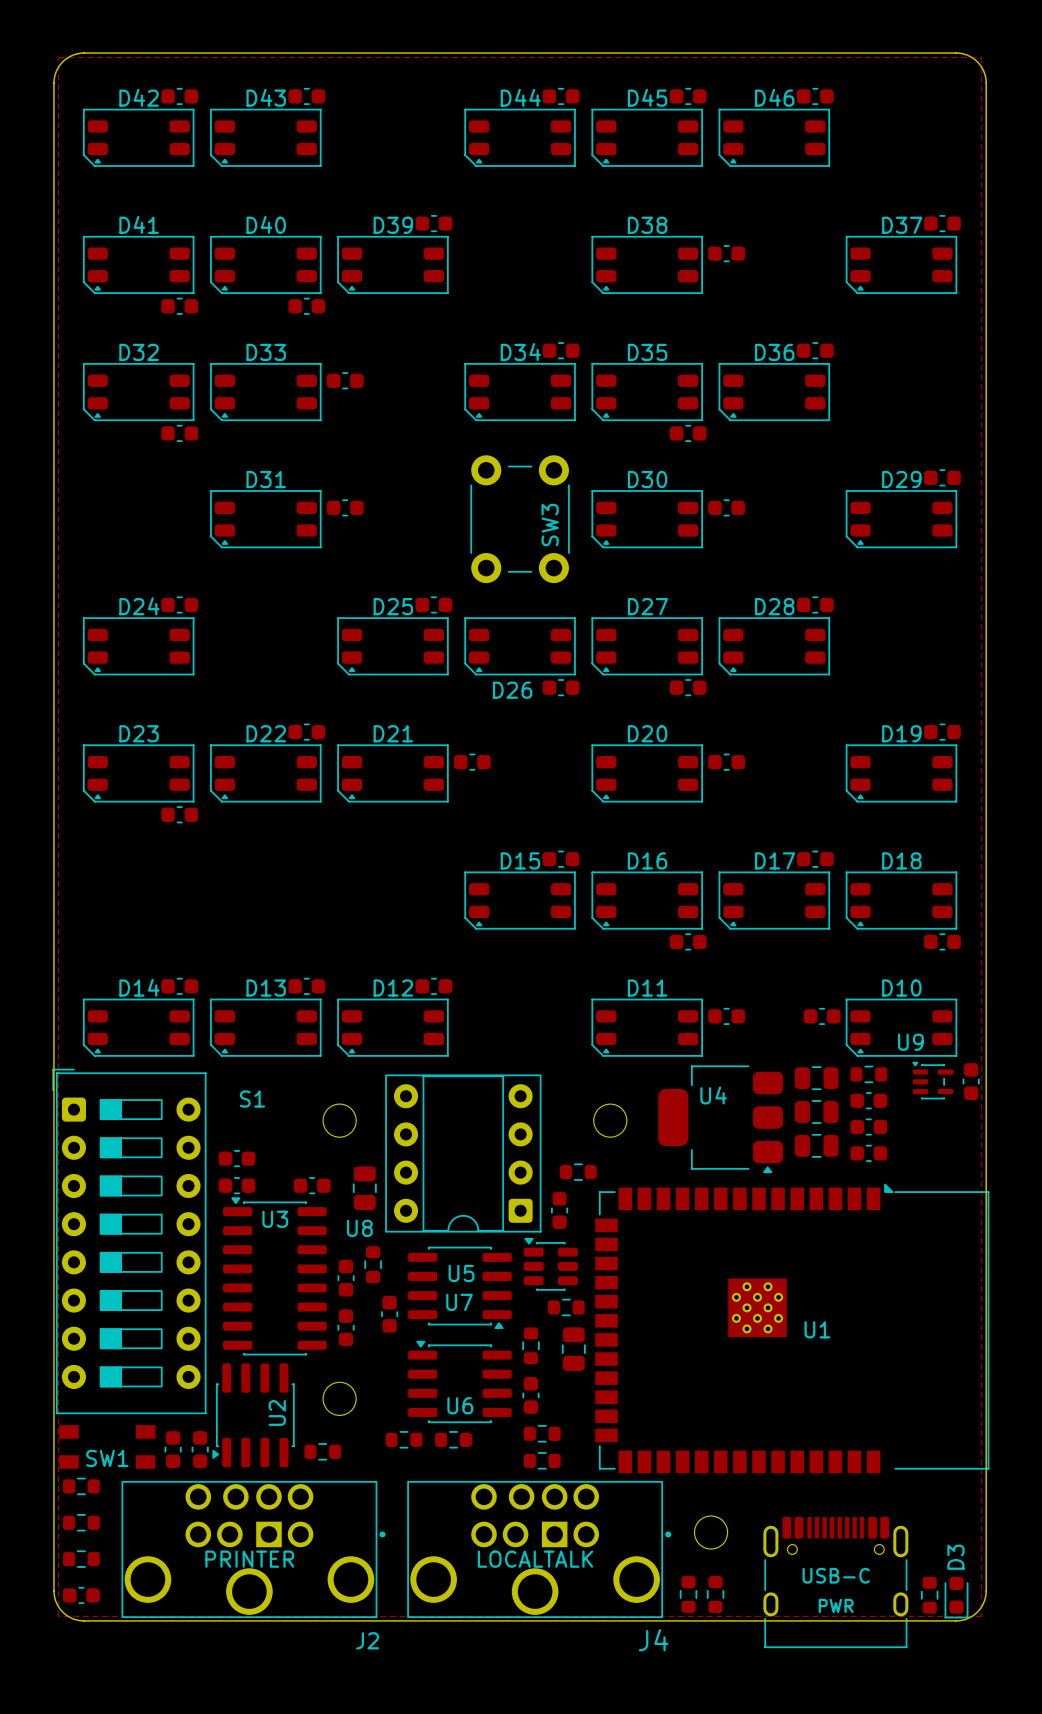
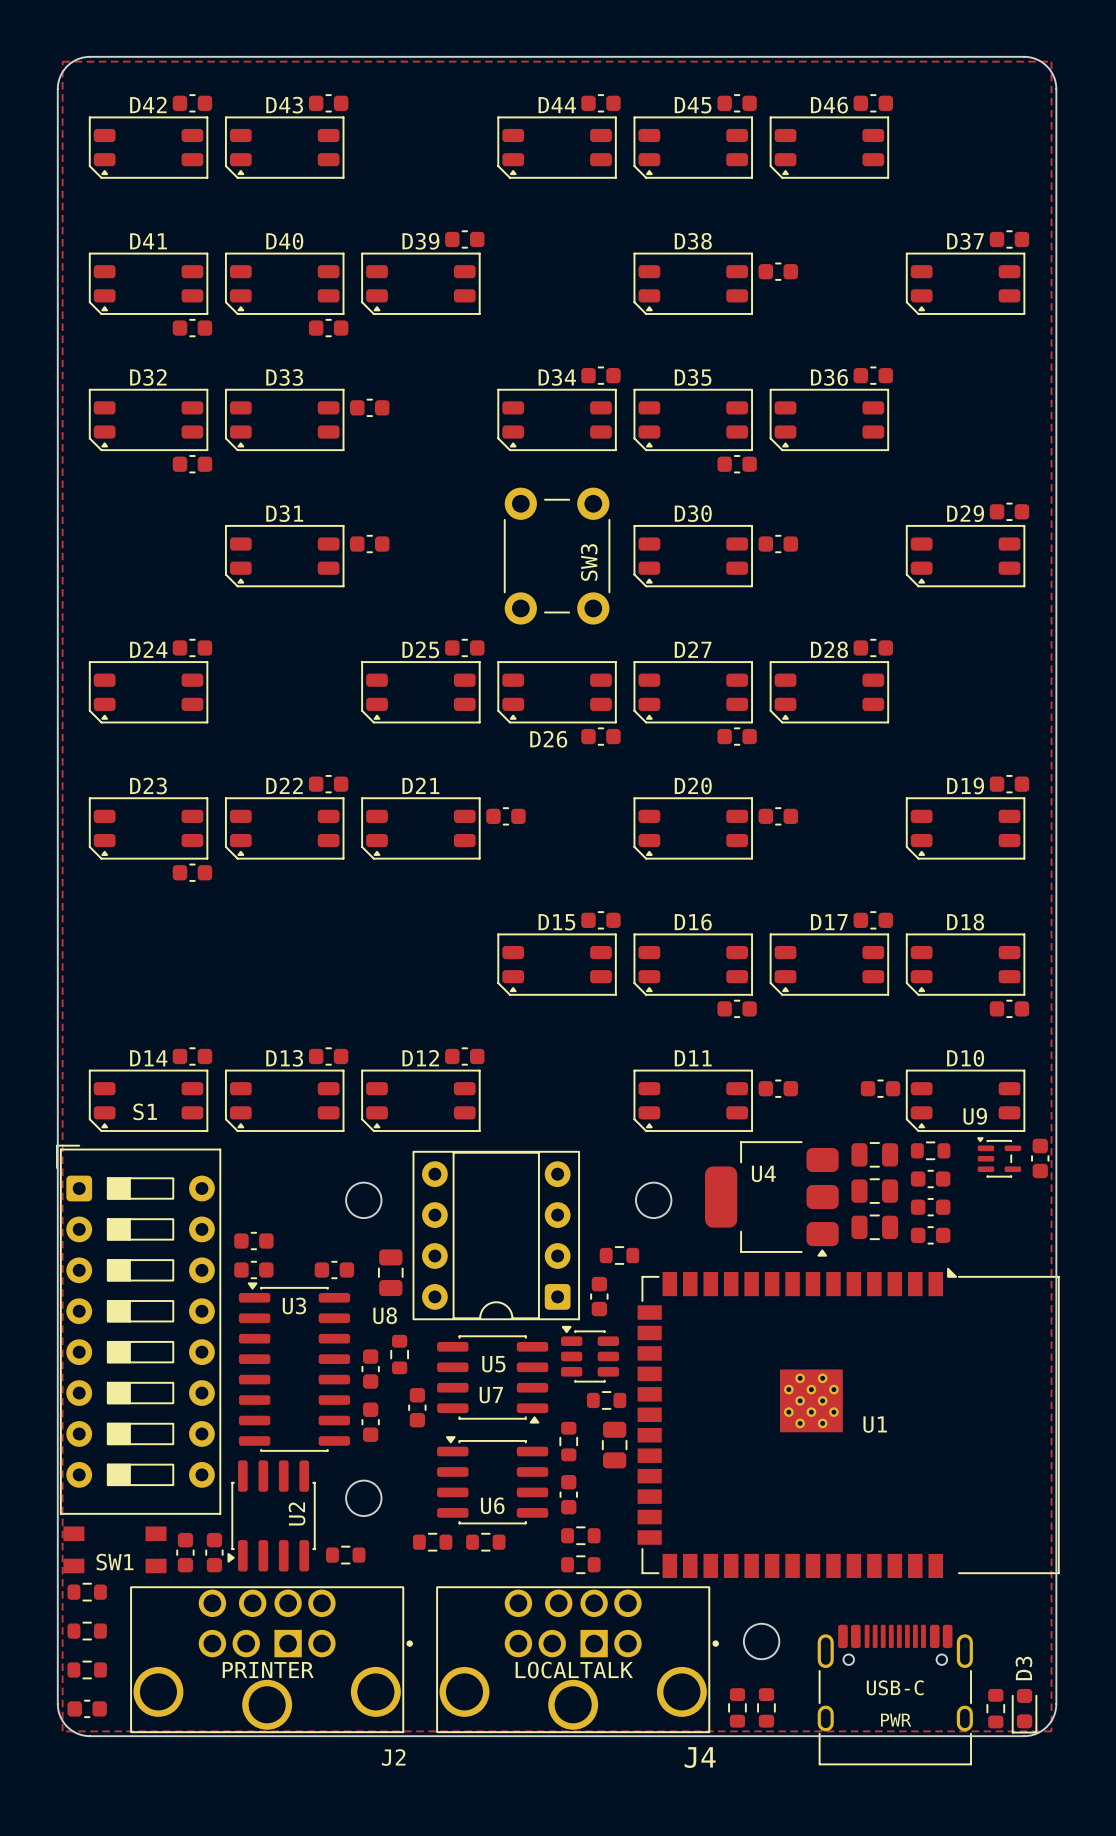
S1 name position: S1 (252, 1099) -> S1 (145, 1111)

